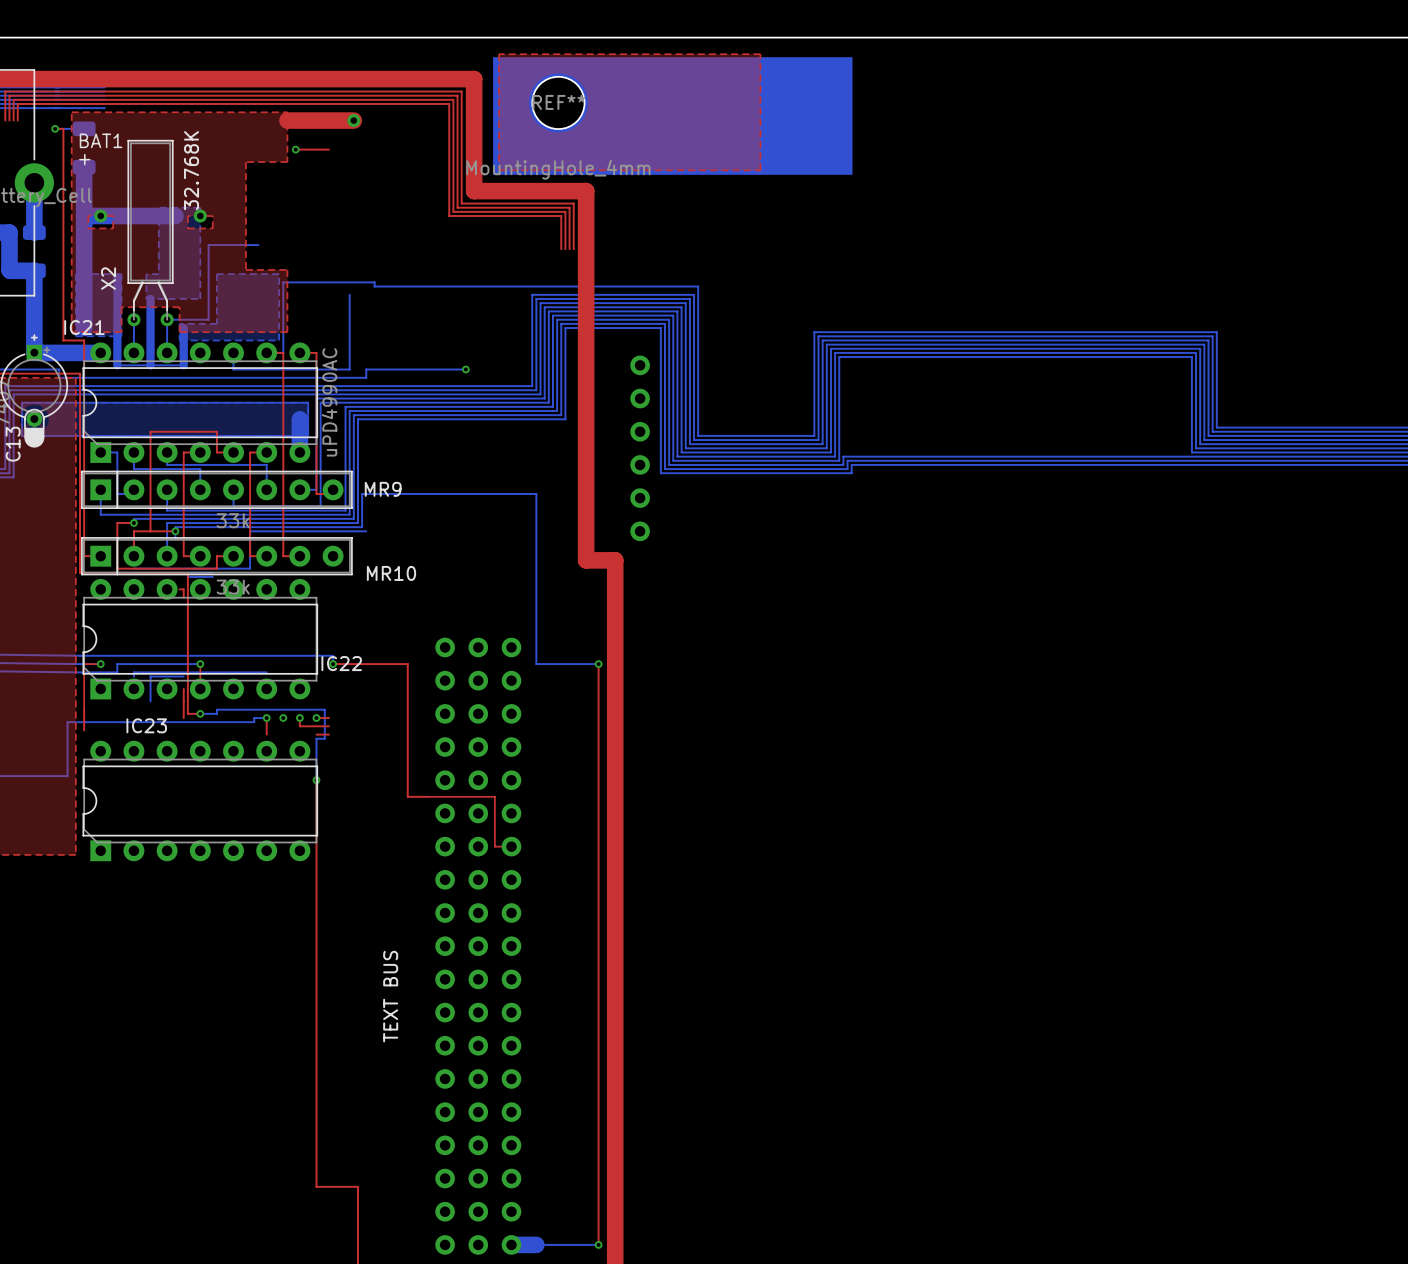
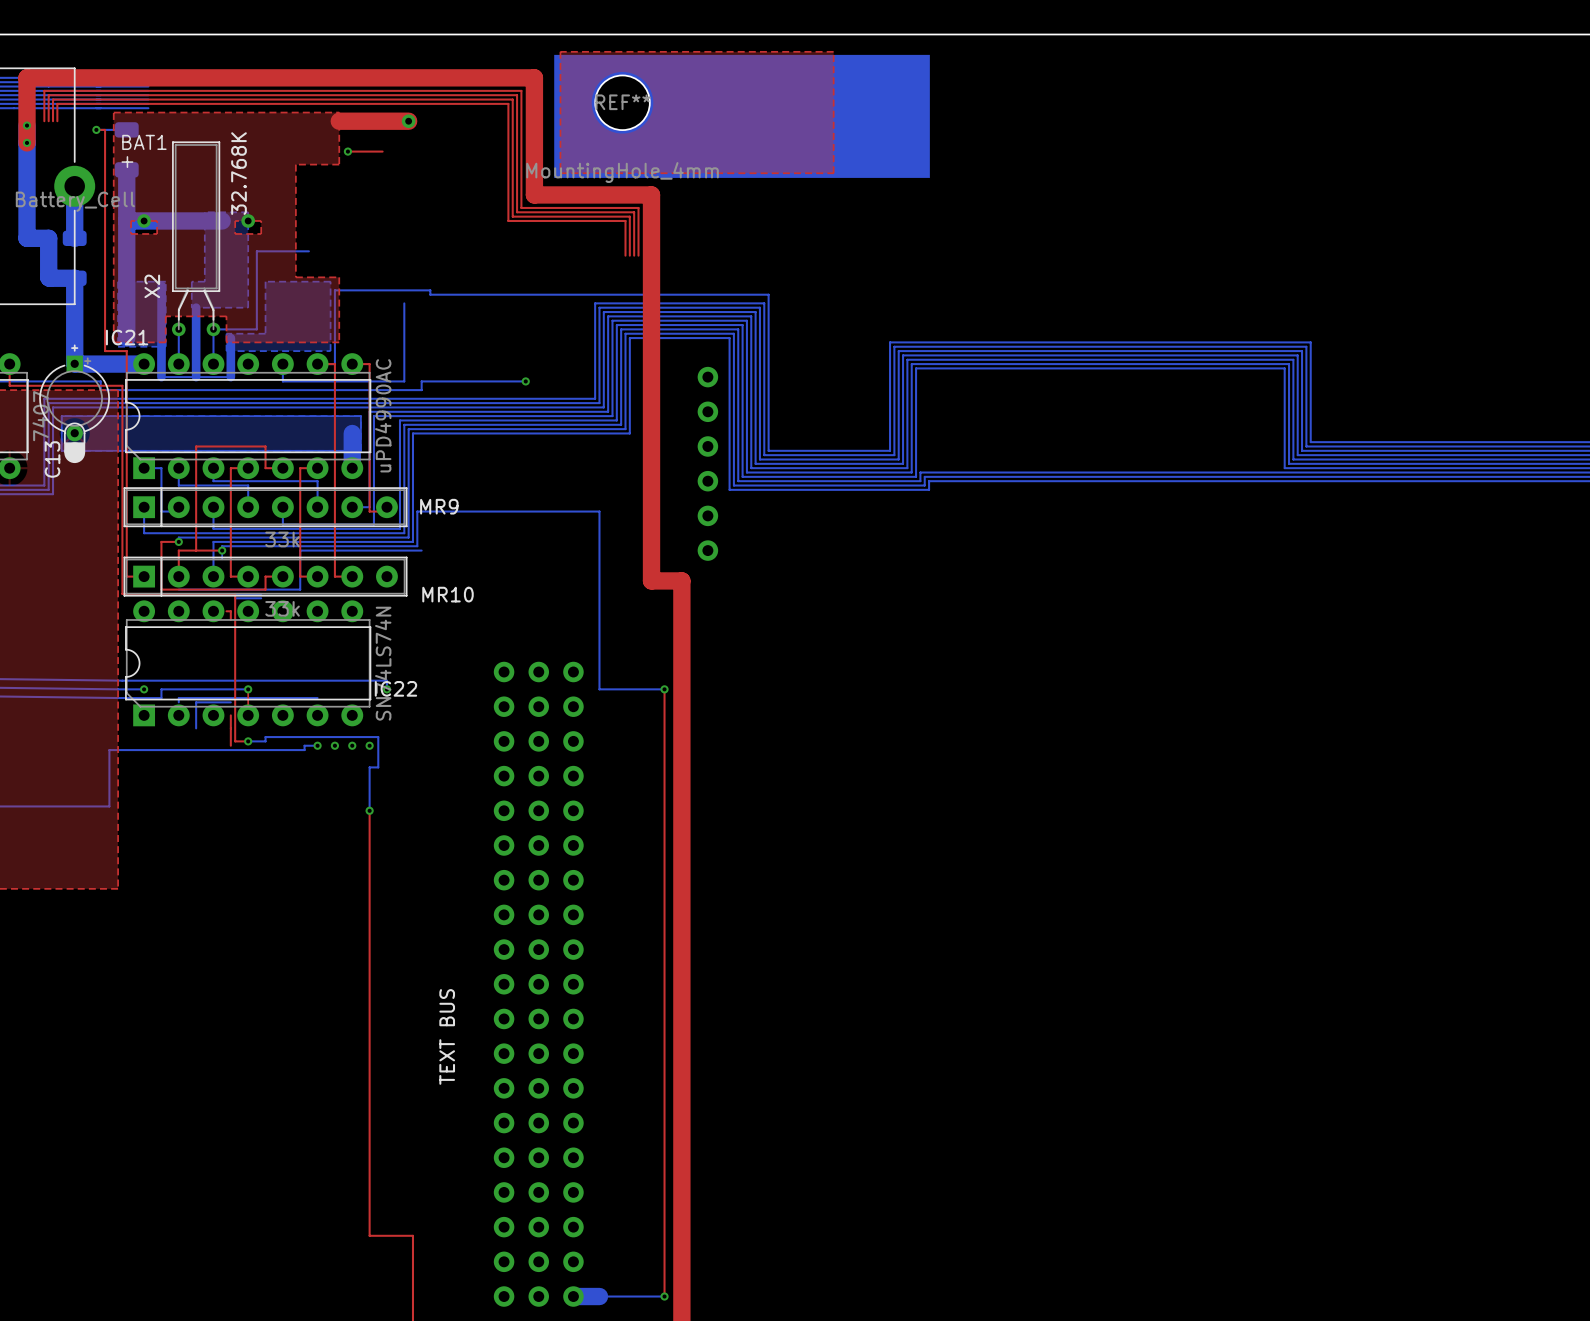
IC22 value: none -> SN74LS74N (383, 663)
top track: (100, 664) (84, 664) (84, 730) -> none
top track: (333, 664) (407, 664) (407, 796) (494, 796) (494, 846) (511, 846) -> none
top track: (266, 718) (266, 734) -> none
top track: (299, 718) (299, 726) (328, 726) -> none
top track: (316, 718) (328, 718) -> none
top track: (316, 734) (328, 734) -> none
IC23: (200, 800) -> none

